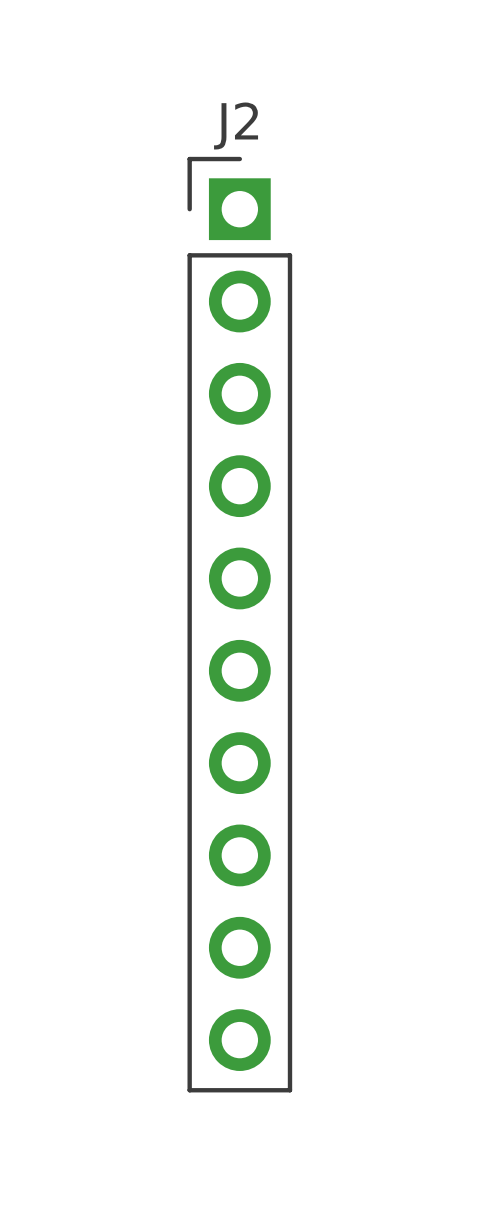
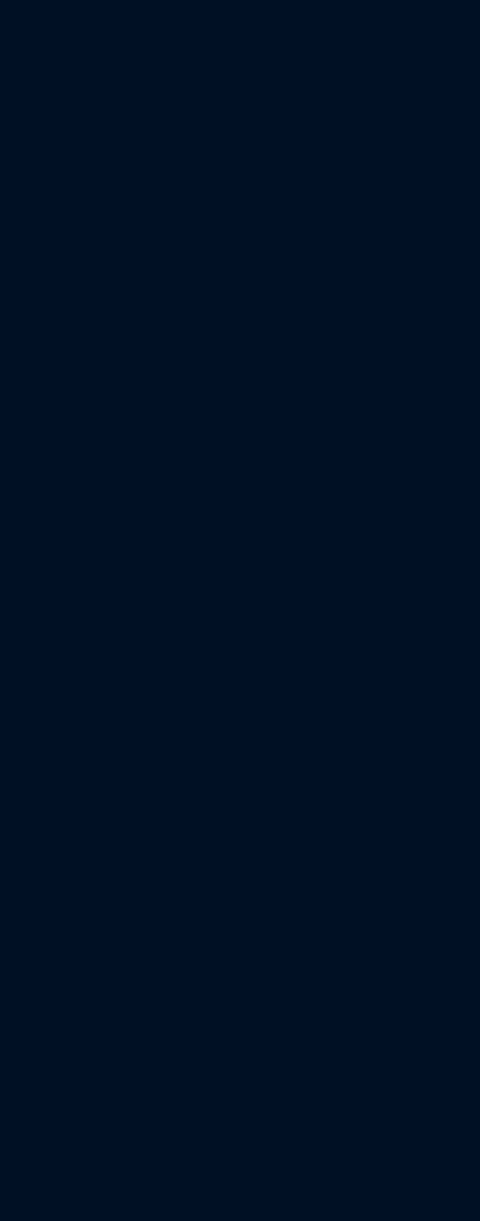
J2: (239, 624) -> none

